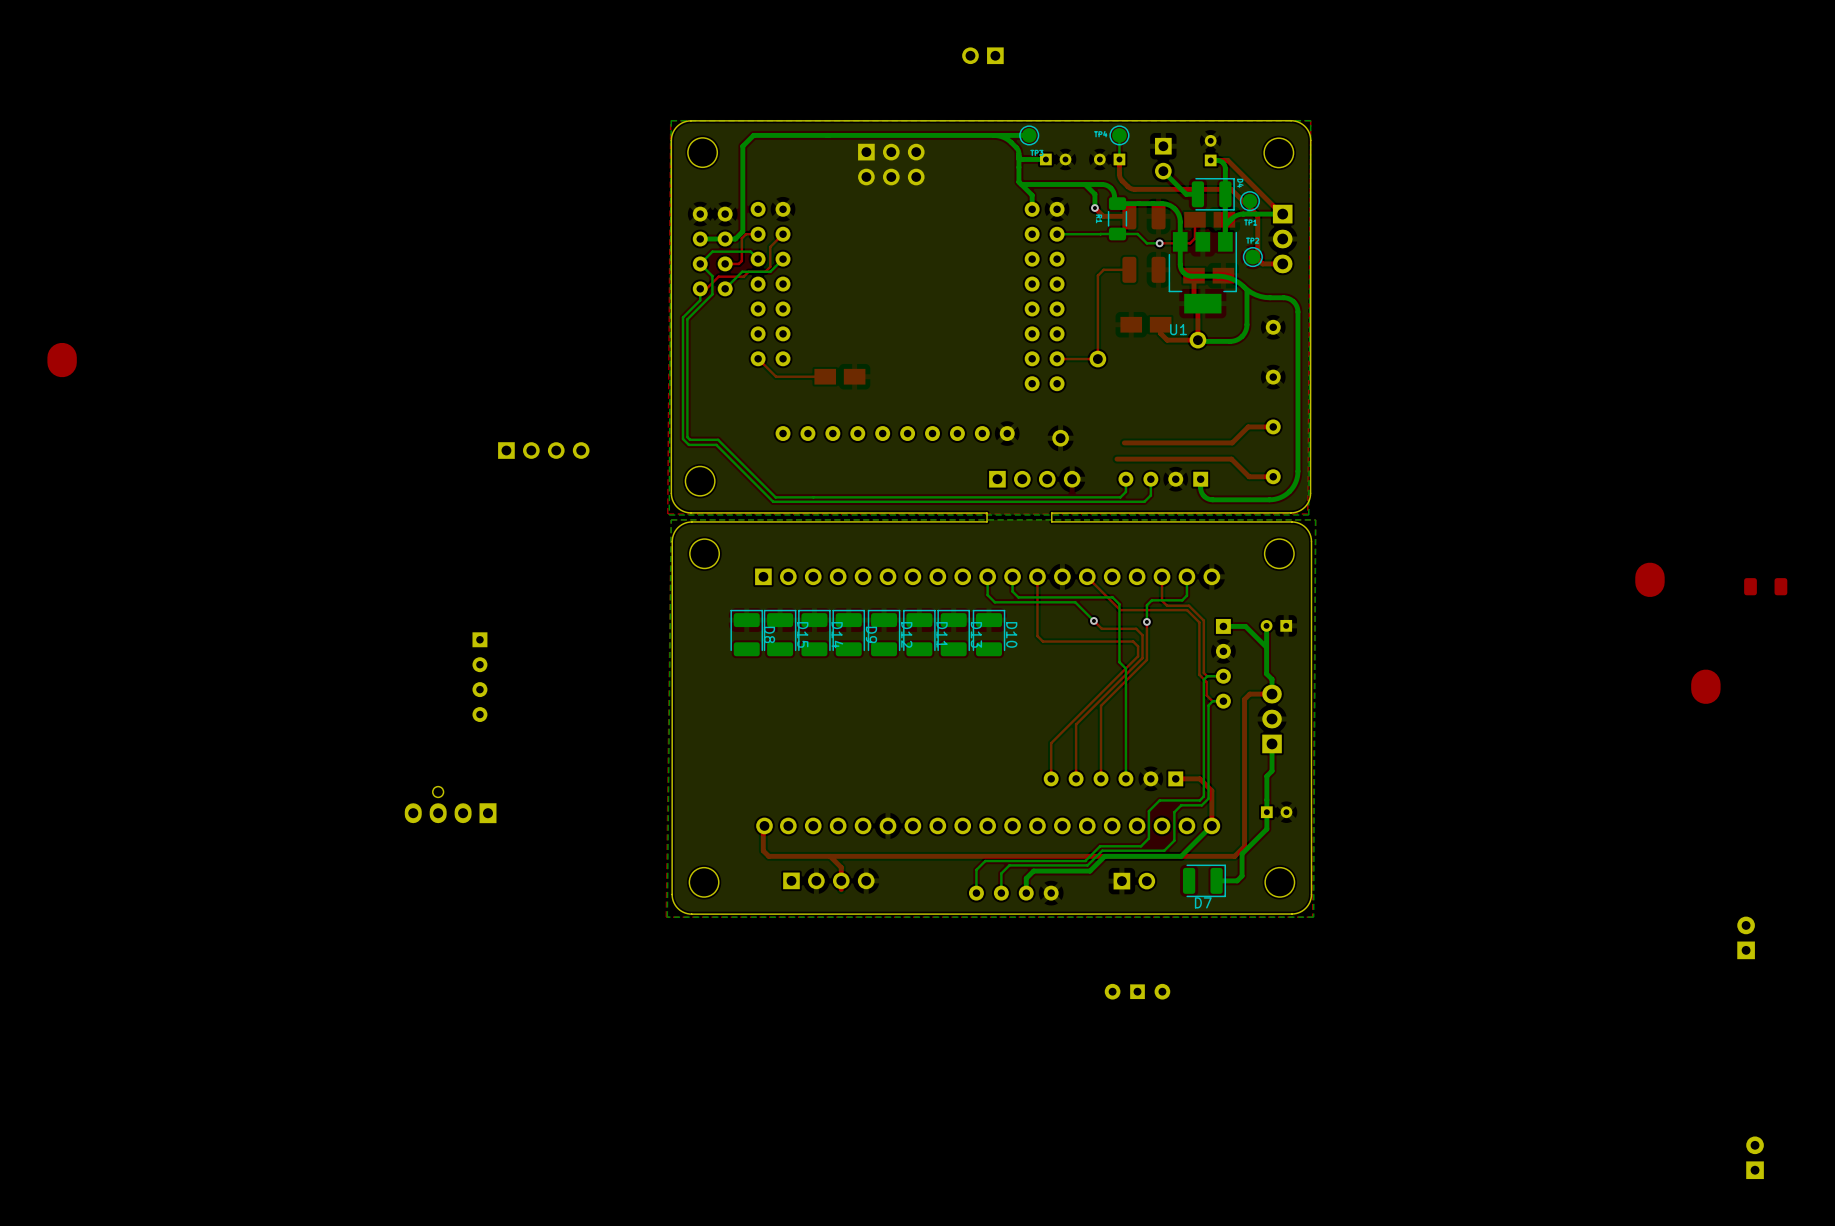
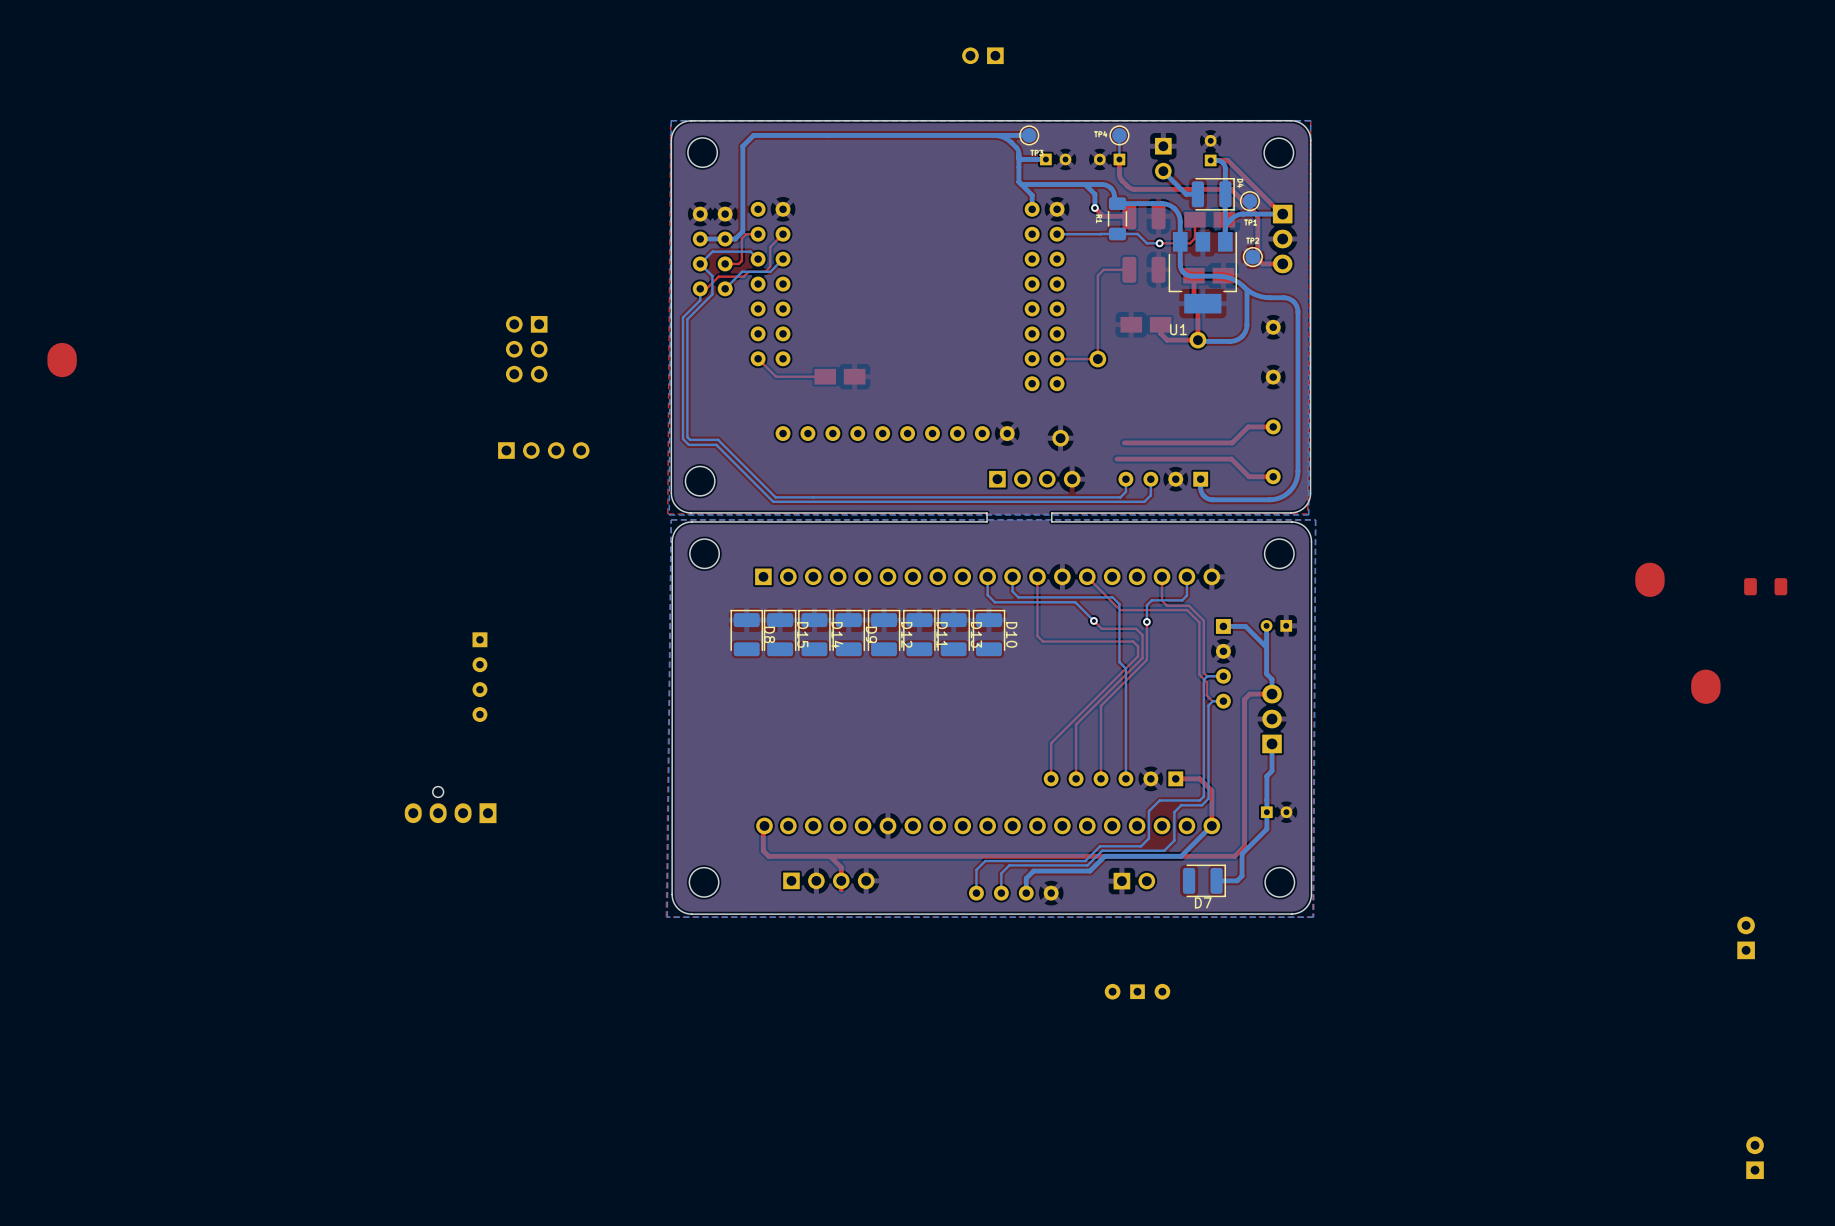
part: (891, 164) -> none
part: none -> (526, 349)

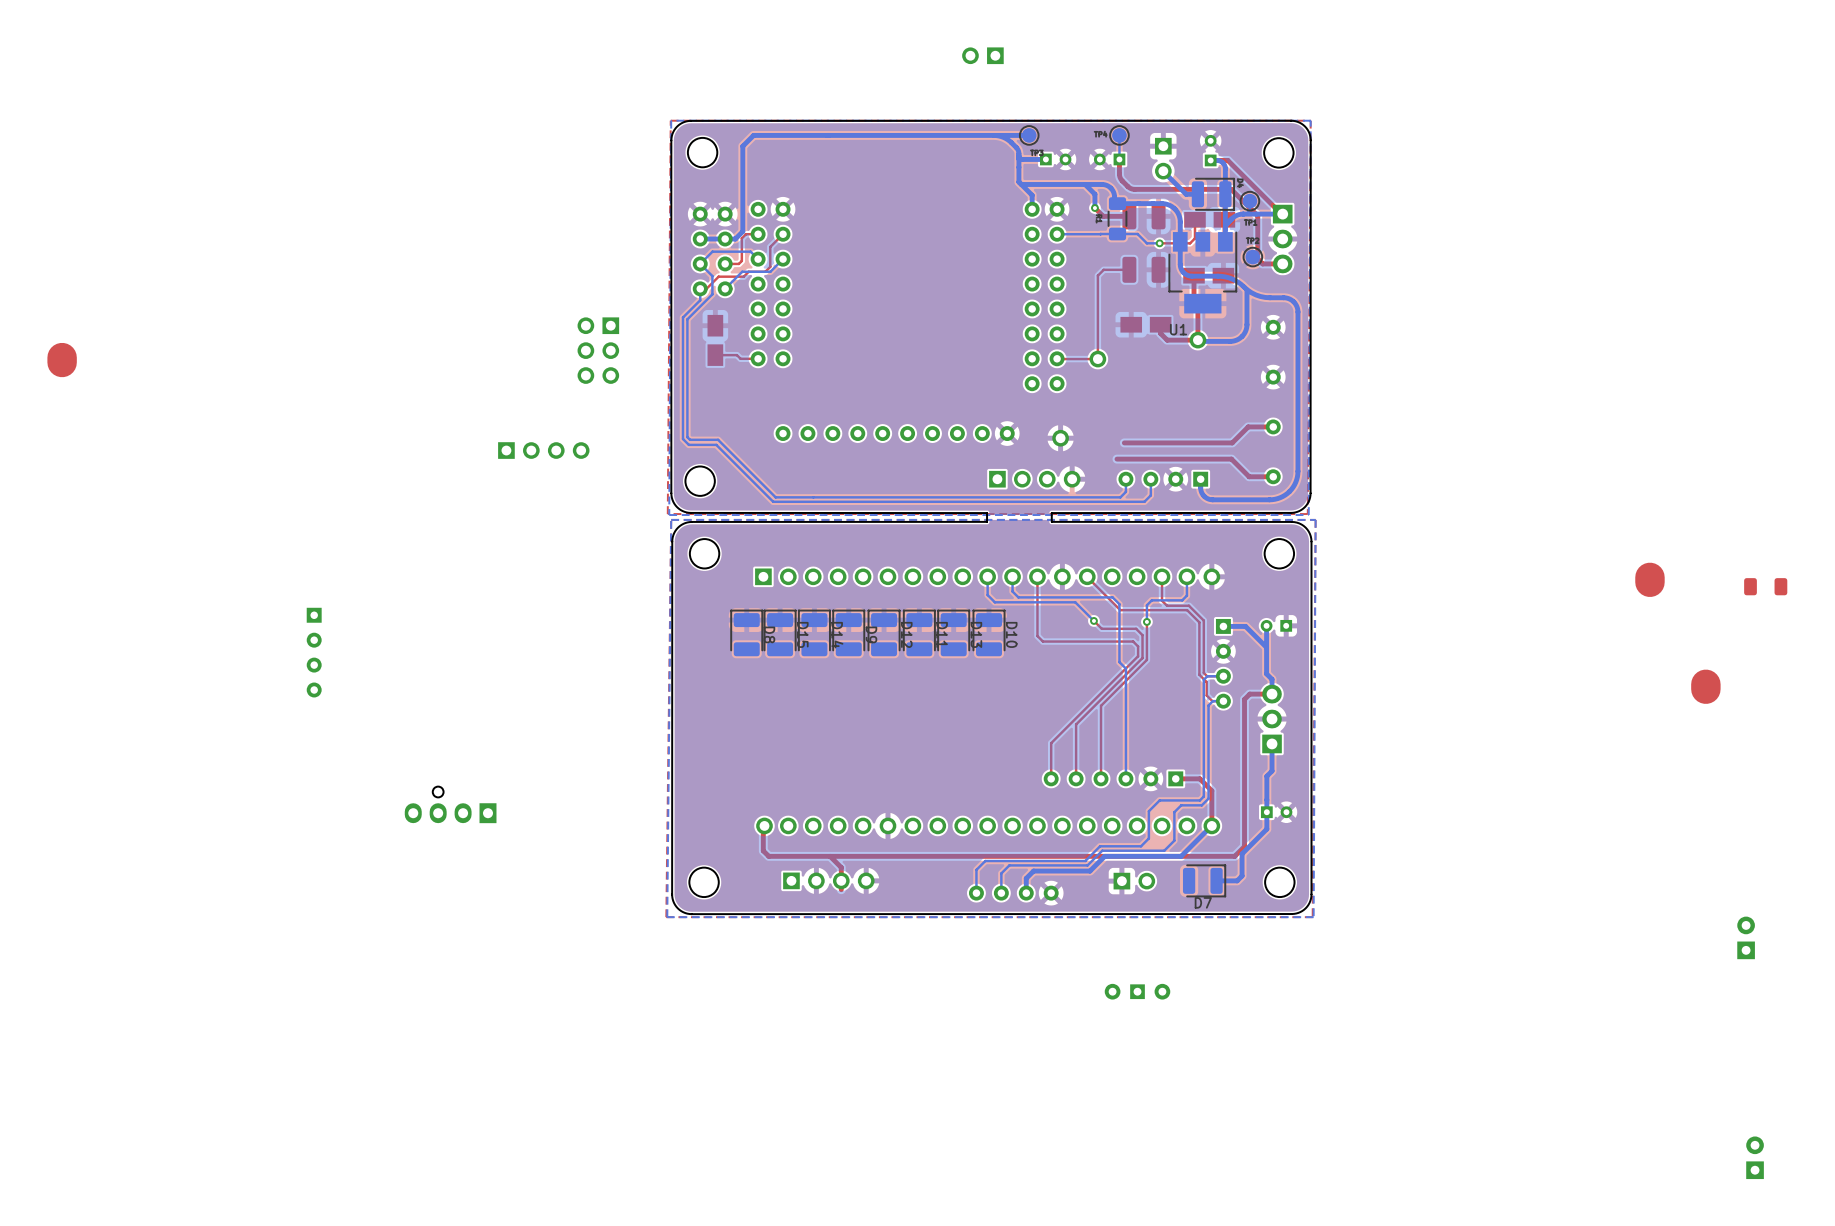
part position: (526, 349) -> (598, 350)
top track: (758, 358) (776, 376) (825, 376) -> (758, 358) (740, 358) (736, 355) (715, 355)
part rotation: 0° (839, 376) -> 90° clockwise (715, 340)
part position: (839, 376) -> (715, 340)
part position: (479, 677) -> (314, 652)

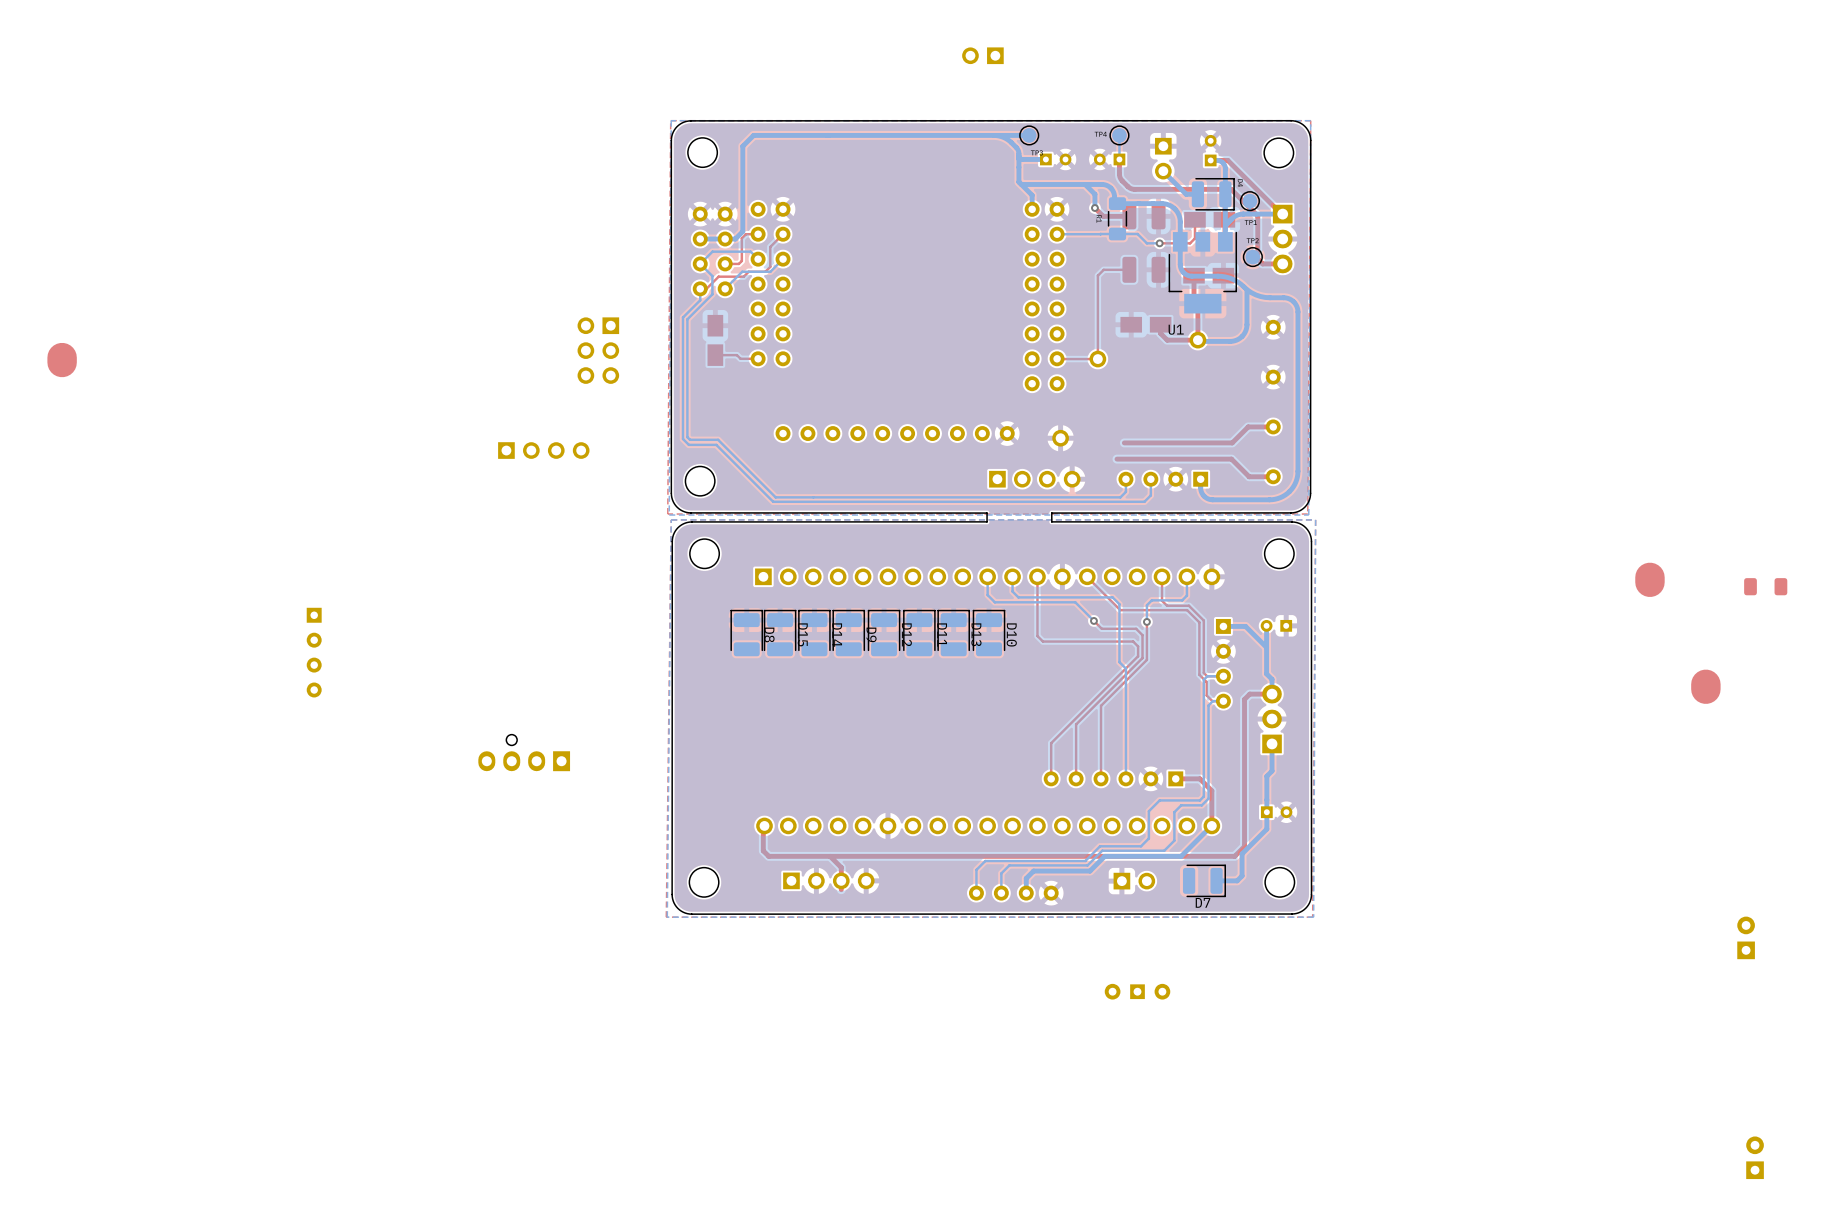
part position: (450, 804) -> (524, 752)

